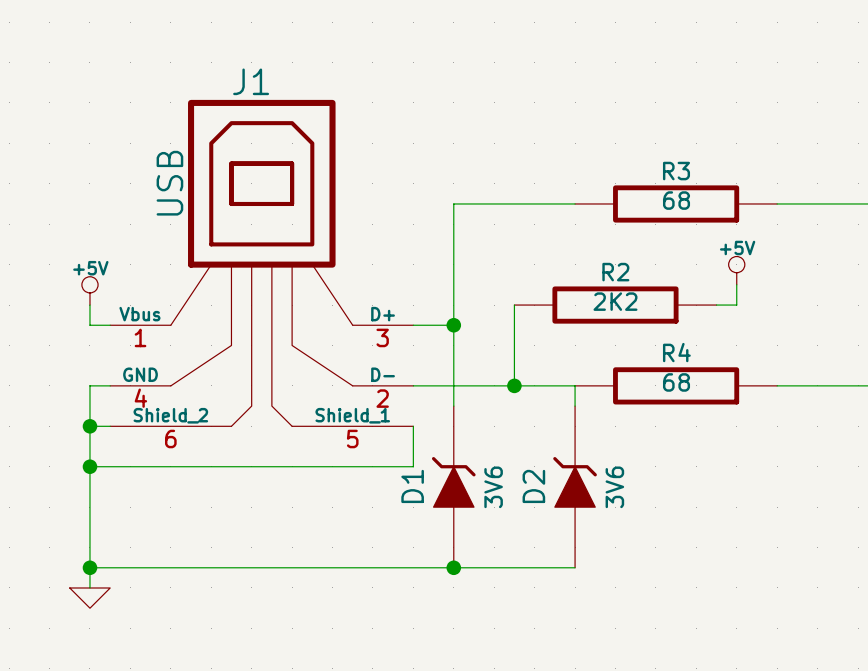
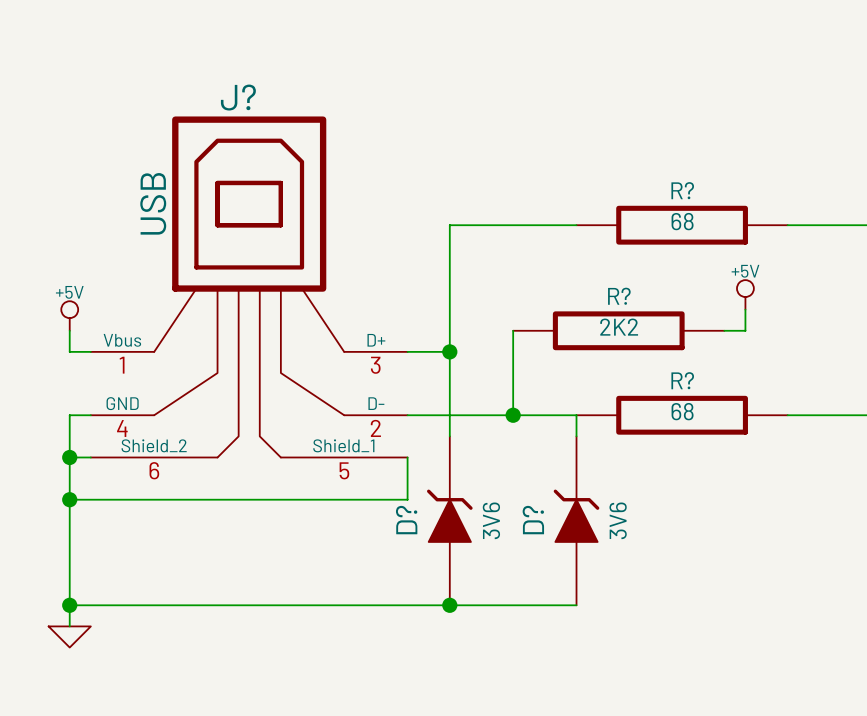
J1 name: J1 (251, 81) -> J? (238, 97)
R3 name: R3 (676, 171) -> R? (682, 190)
R2 name: R2 (615, 272) -> R? (619, 296)
R4 name: R4 (676, 352) -> R? (682, 380)
D1 name: D1 (412, 486) -> D? (406, 520)
D2 name: D2 (533, 486) -> D? (533, 520)

